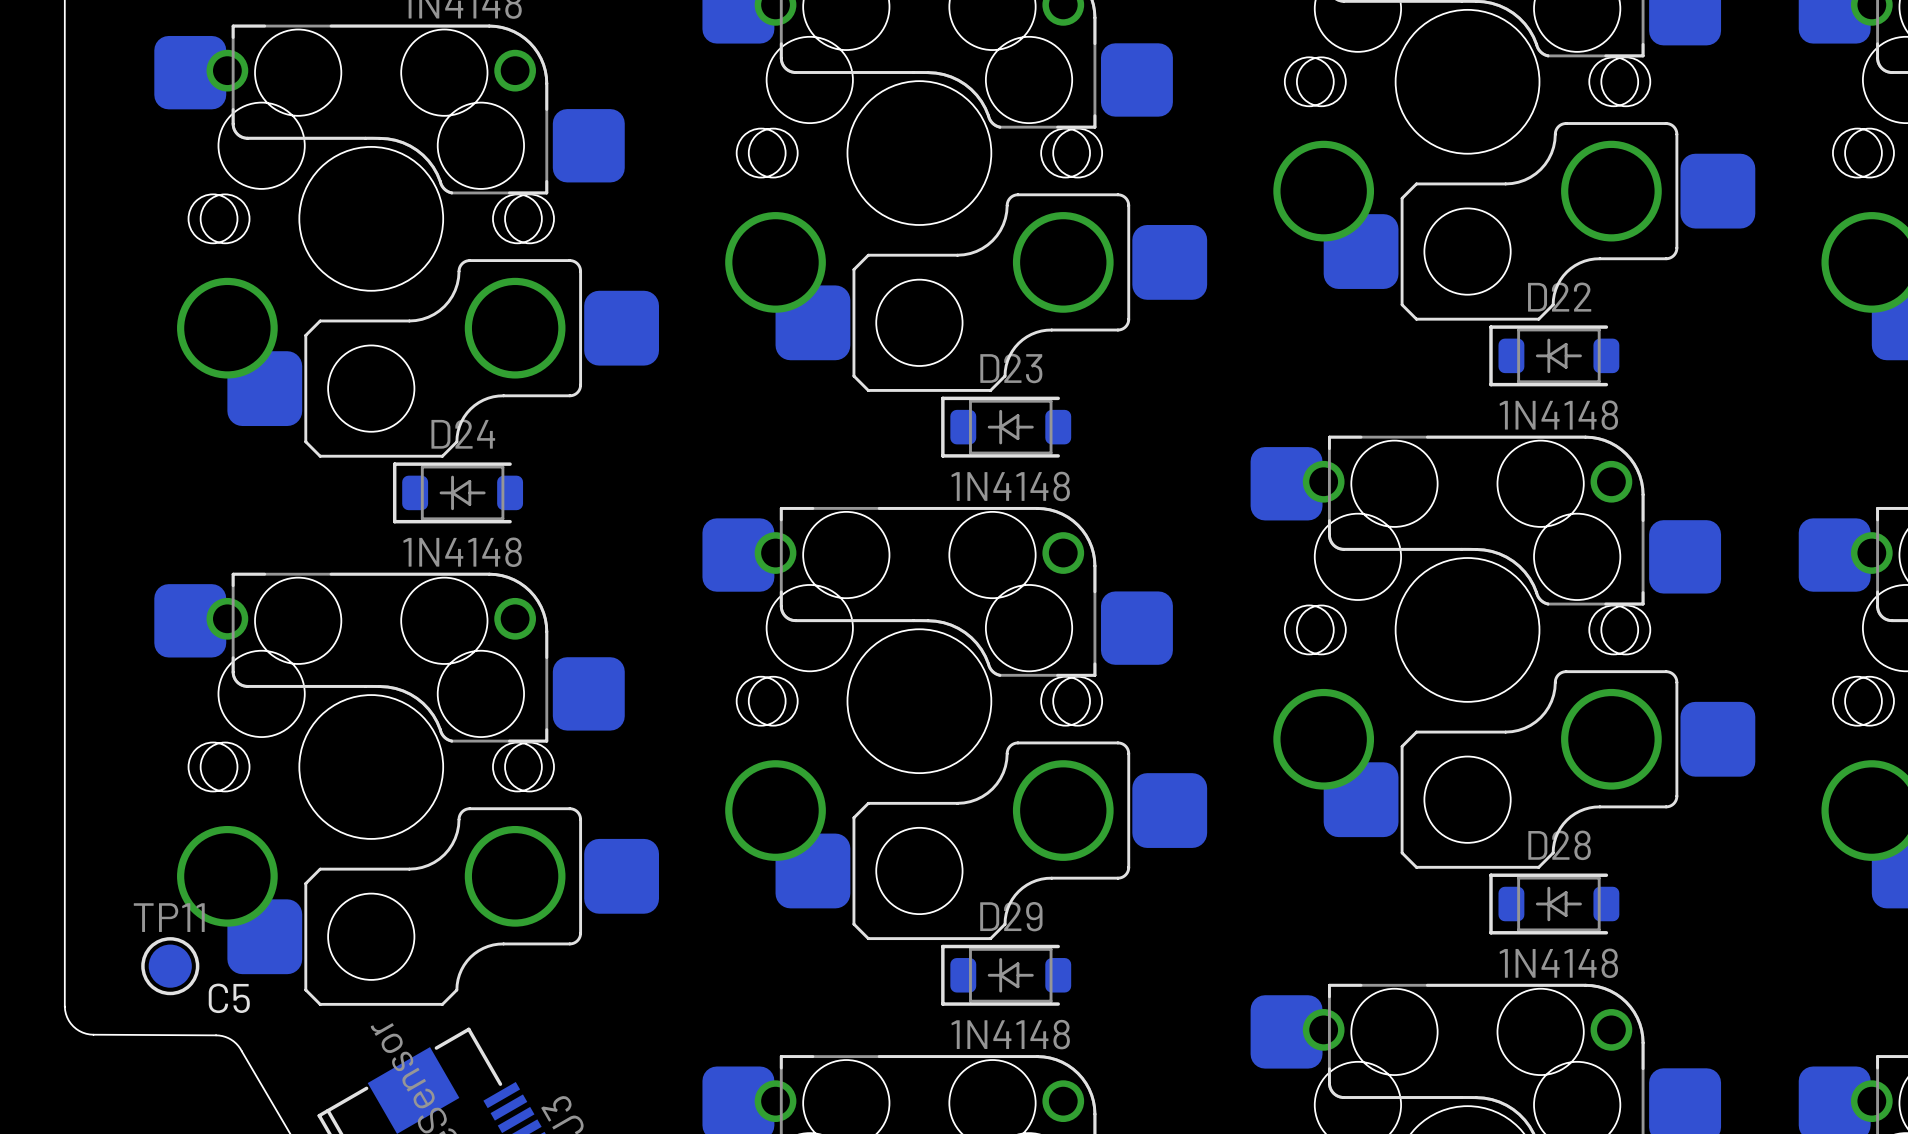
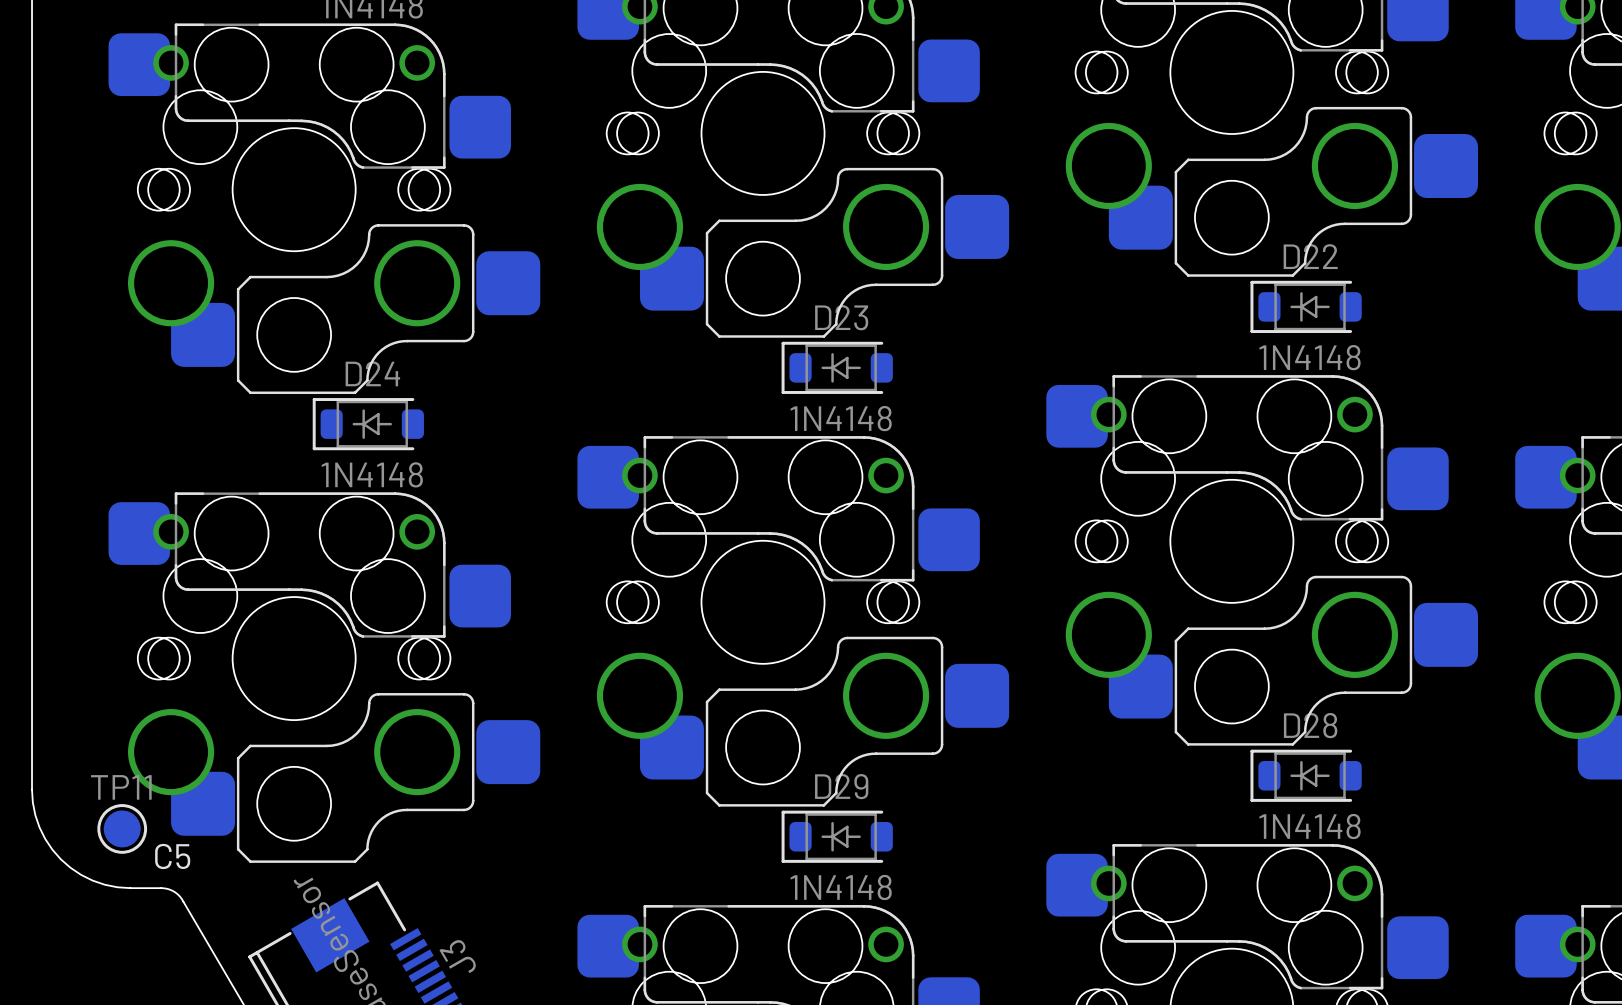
board edge: (64, 920) (64, 1006) -> none
board edge: (64, 1006) (70, 1023) (79, 1030) (89, 1034) (215, 1035) -> (32, 789) (32, 802) (39, 827) (52, 849) (70, 867) (92, 880) (104, 884) (130, 888) (161, 888)

